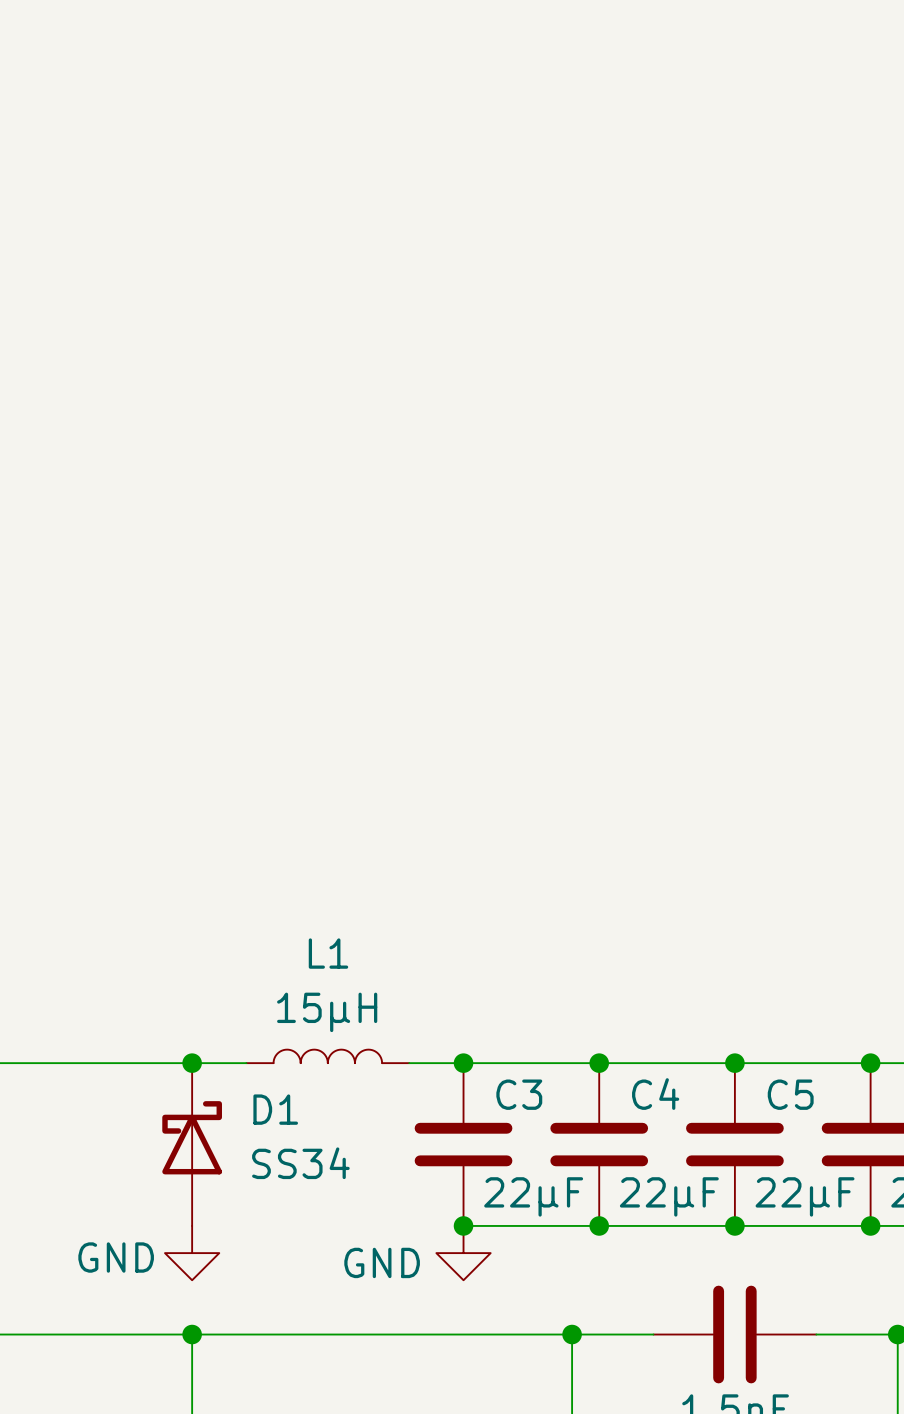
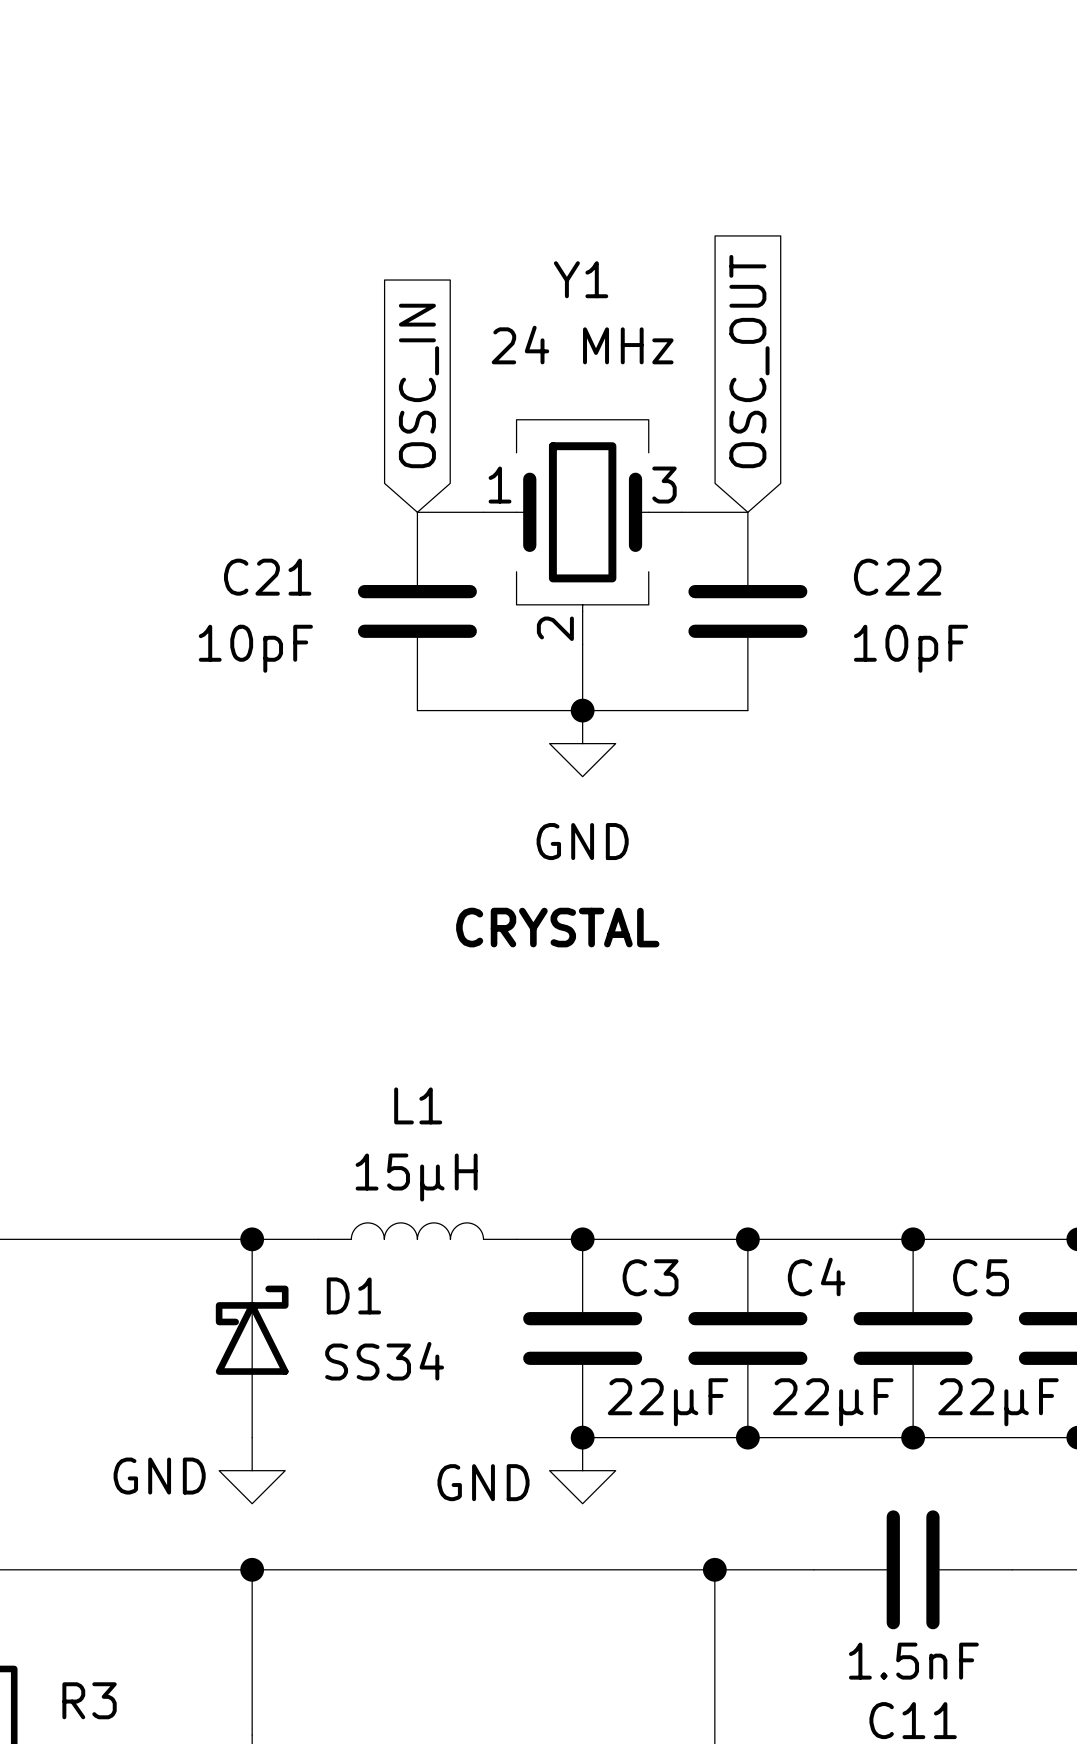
global label: none -> OSC_OUT (749, 361)
global label: none -> OSC_IN (418, 385)
wire: none -> (417, 512) (483, 512)
wire: none -> (681, 512) (747, 512)
Y1: none -> 24 MHz (582, 532)
C21: none -> 10pF (417, 611)
C22: none -> 10pF (747, 611)
wire: none -> (582, 644) (582, 710)
wire: none -> (417, 710) (747, 710)
junction: none -> (582, 710)
power symbol: none -> GND (582, 743)
text: none -> CRYSTAL (557, 927)

